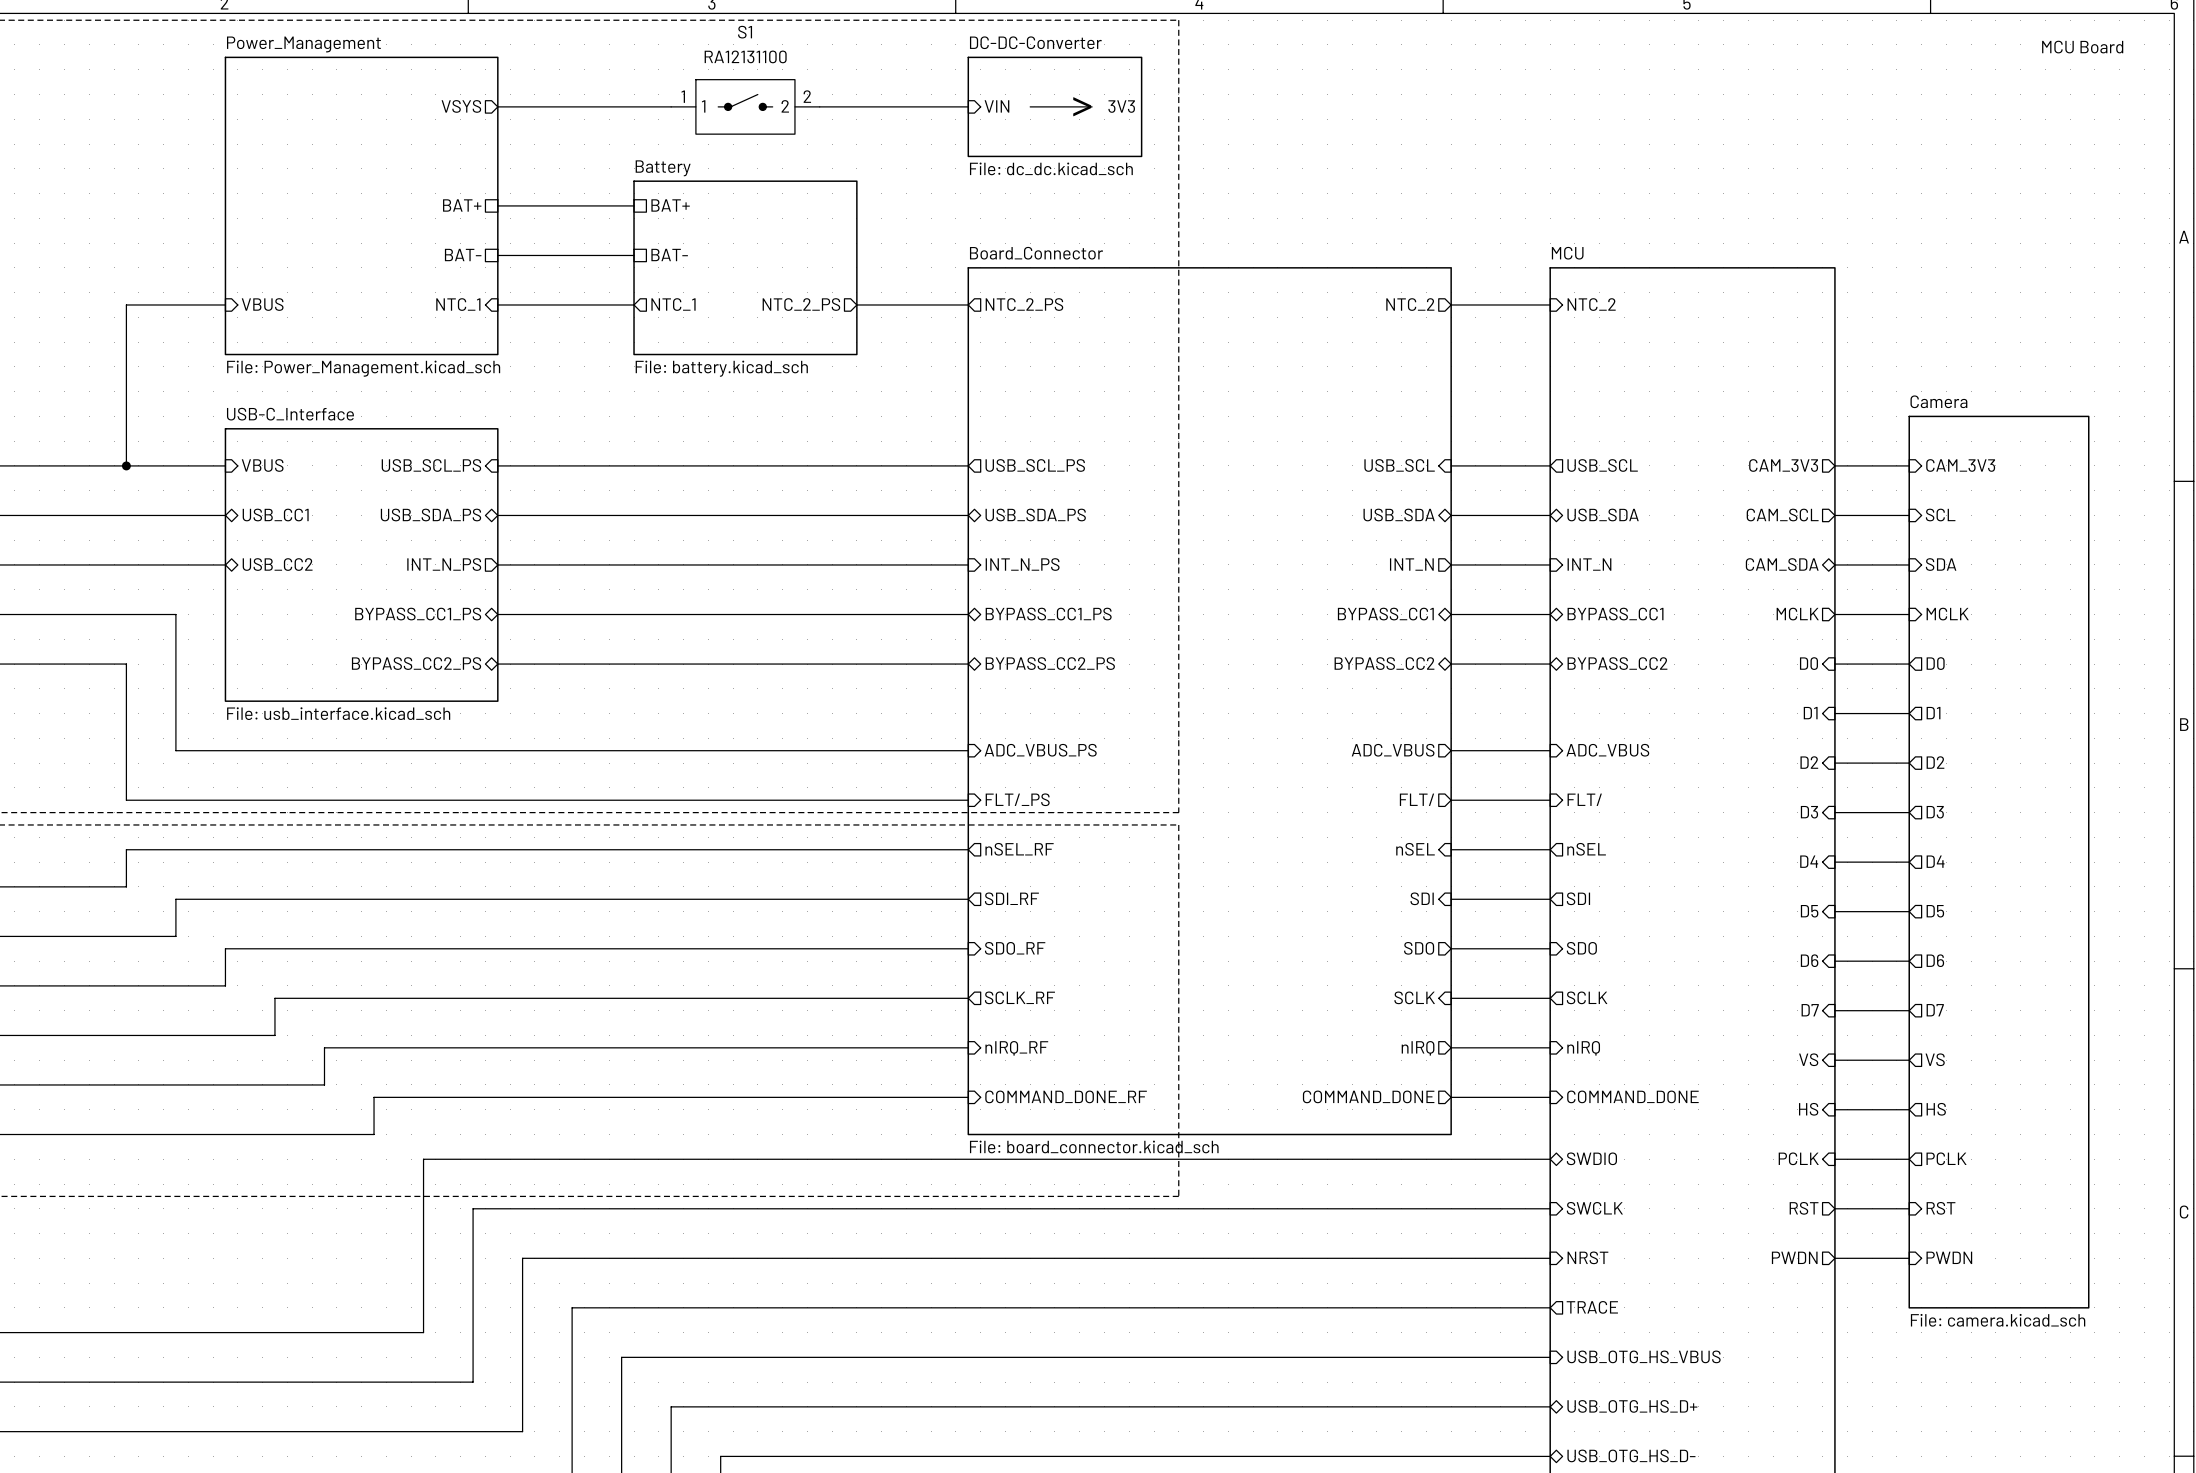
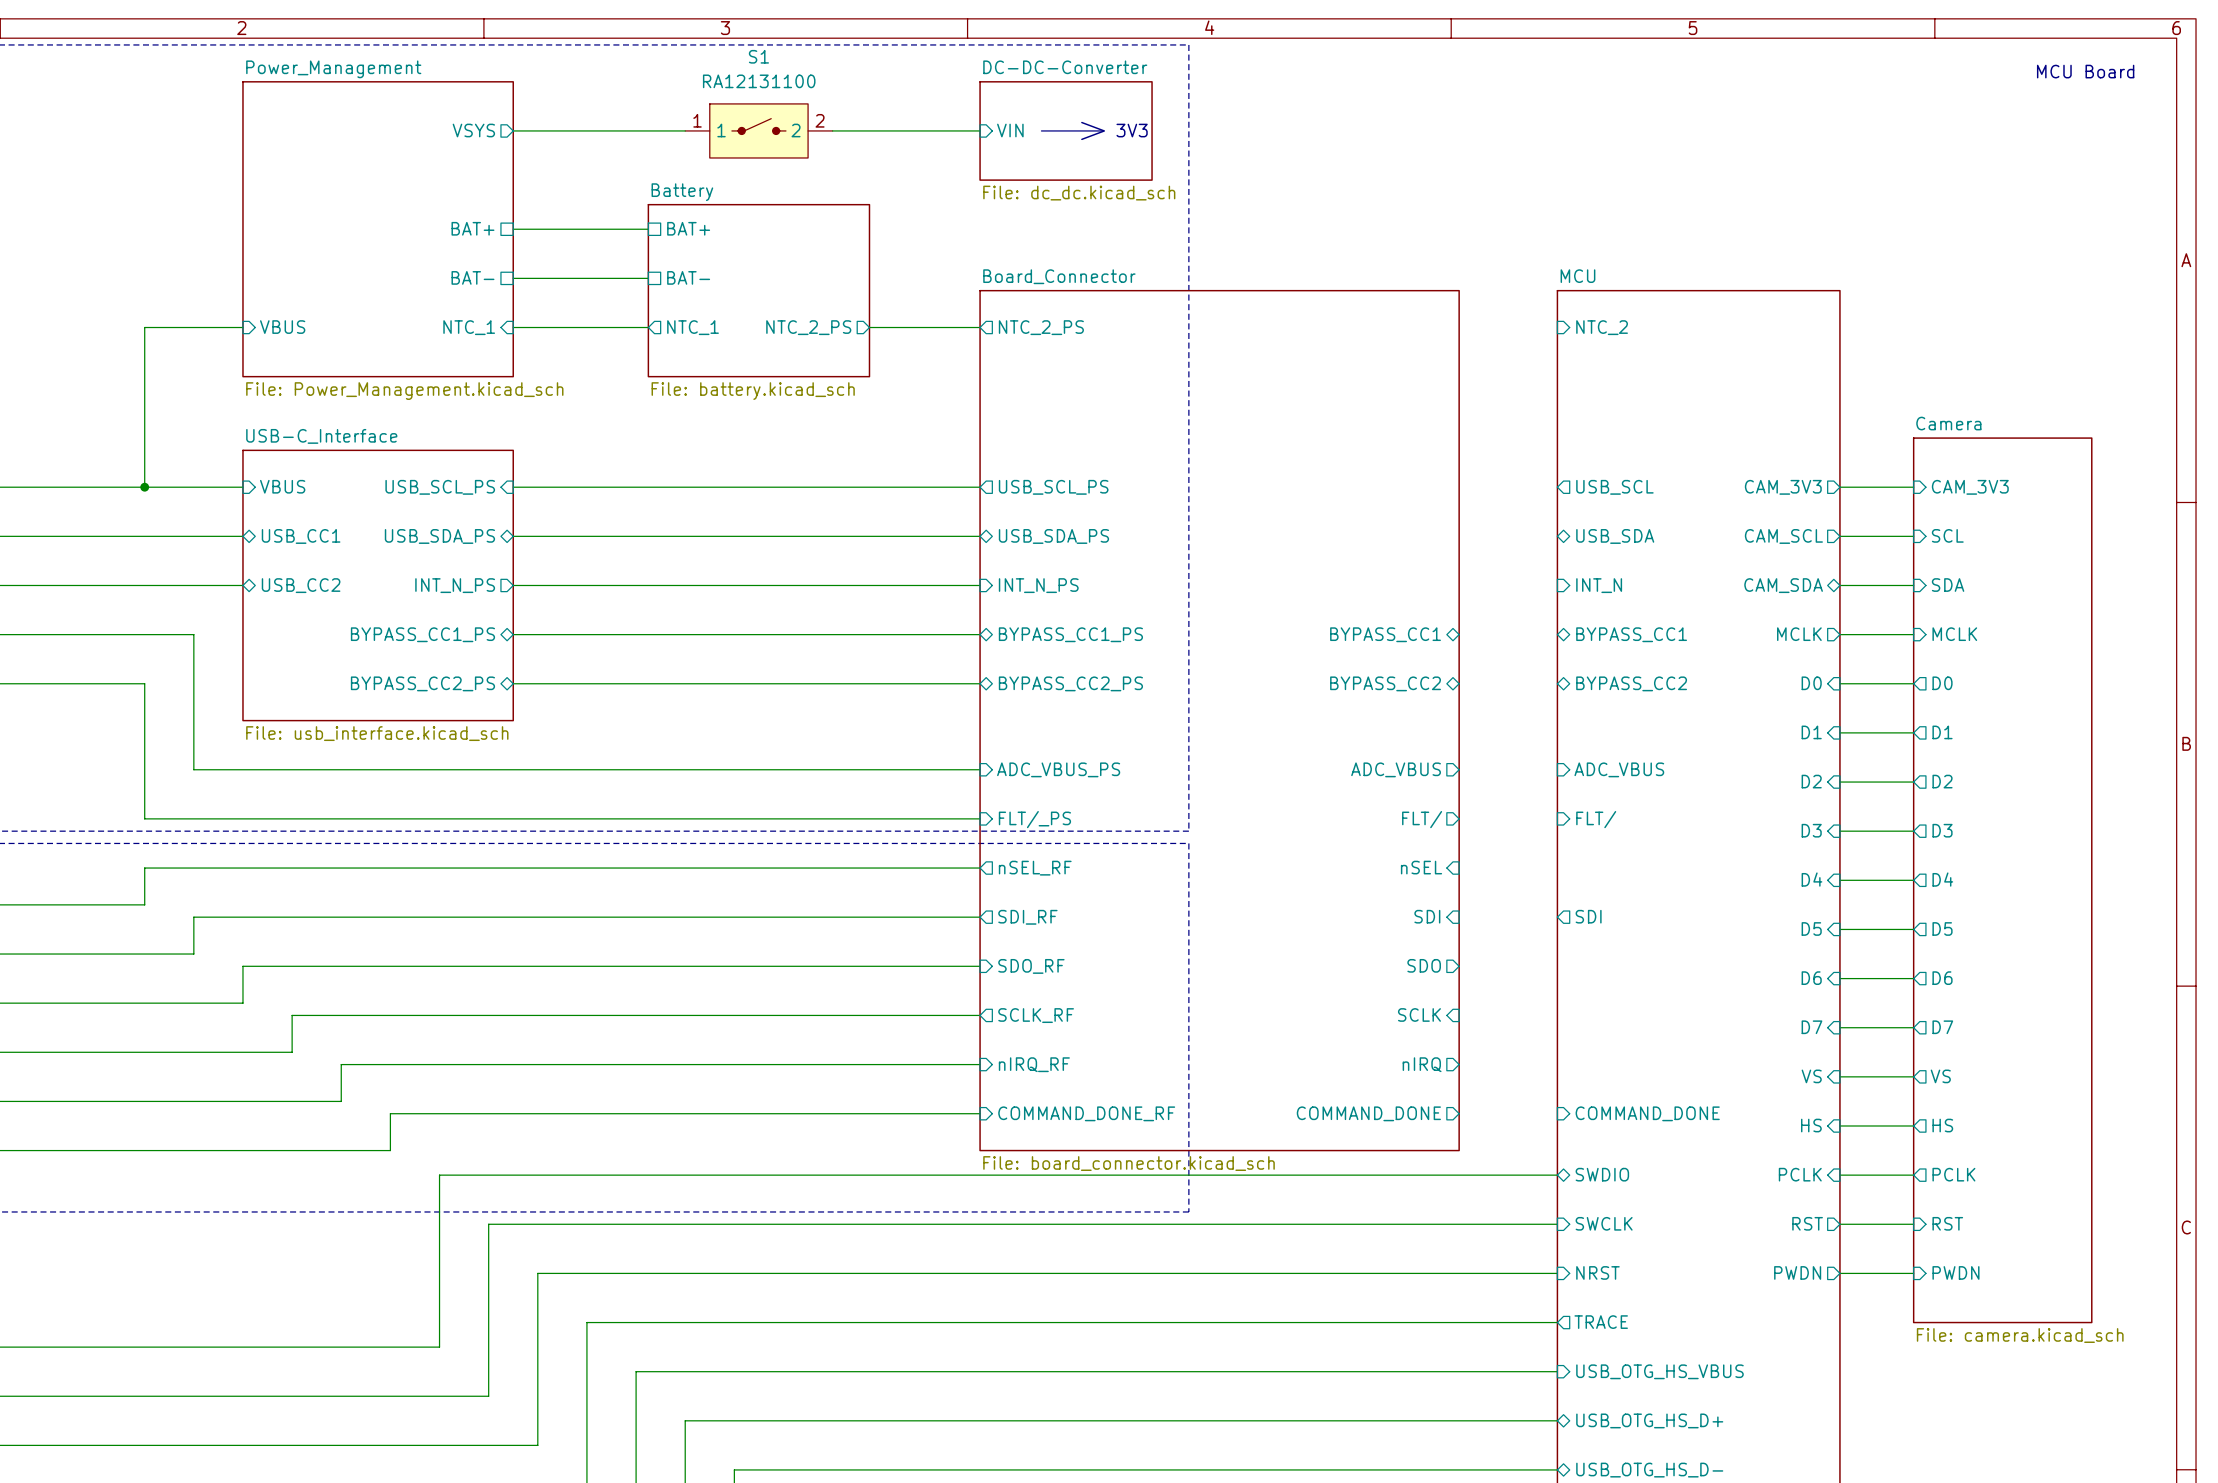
sheet pin: NTC_2 (1410, 304) -> none
wire: (1451, 304) (1550, 304) -> none
sheet pin: USB_SCL (1399, 465) -> none
wire: (1451, 465) (1550, 465) -> none
sheet pin: USB_SDA (1399, 515) -> none
wire: (1451, 515) (1550, 515) -> none
sheet pin: INT_N (1411, 564) -> none
wire: (1451, 564) (1550, 564) -> none
wire: (1451, 614) (1550, 614) -> none
wire: (1451, 664) (1550, 664) -> none
wire: (1451, 750) (1550, 750) -> none
wire: (1451, 800) (1550, 800) -> none
wire: (1451, 849) (1550, 849) -> none
sheet pin: nSEL (1586, 849) -> none
wire: (1451, 899) (1550, 899) -> none
wire: (1451, 948) (1550, 948) -> none
sheet pin: SDO (1581, 948) -> none
sheet pin: SCLK (1587, 997) -> none
wire: (1451, 998) (1550, 998) -> none
wire: (1451, 1047) (1550, 1047) -> none
sheet pin: nIRQ (1583, 1048) -> none
wire: (1451, 1097) (1550, 1097) -> none

